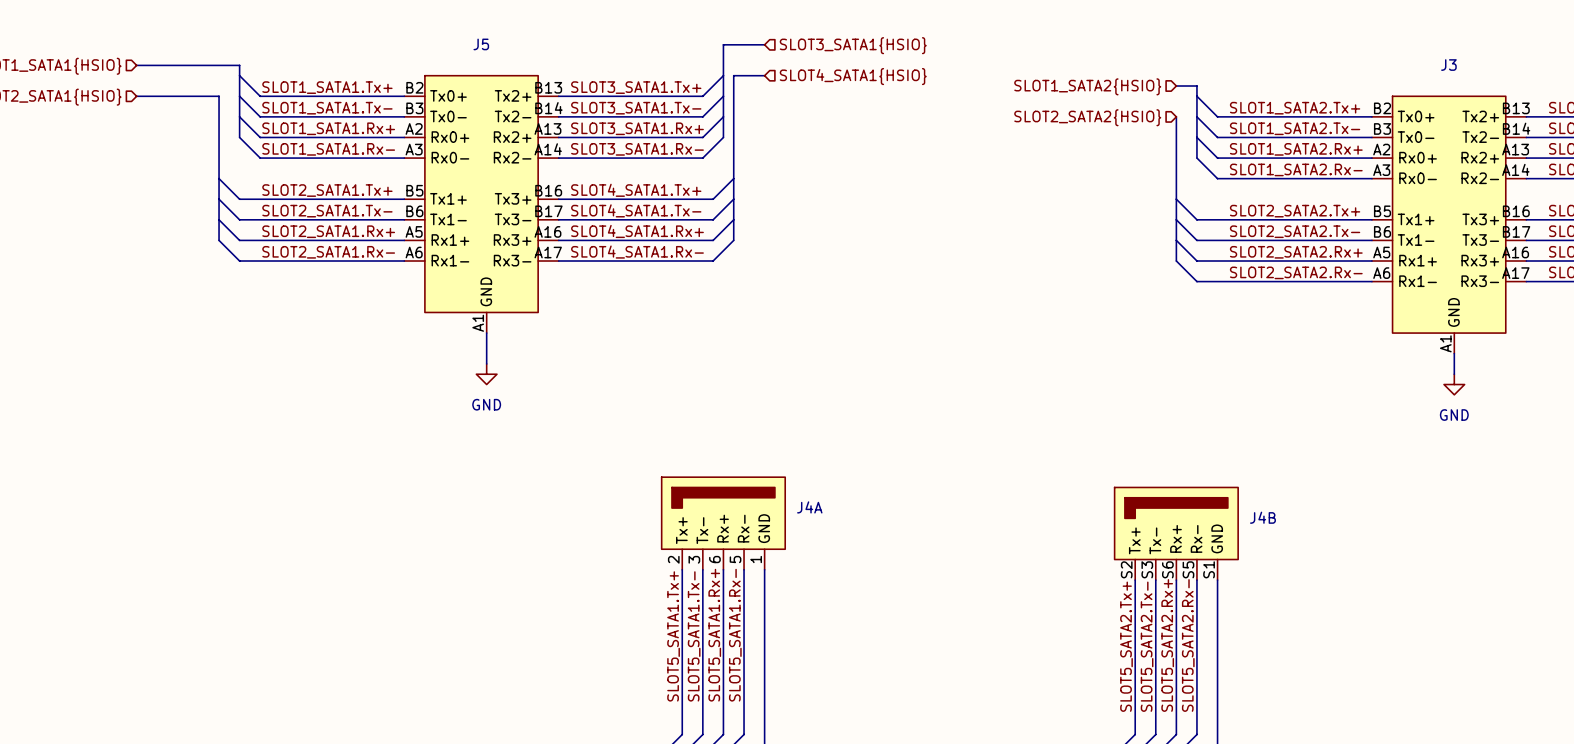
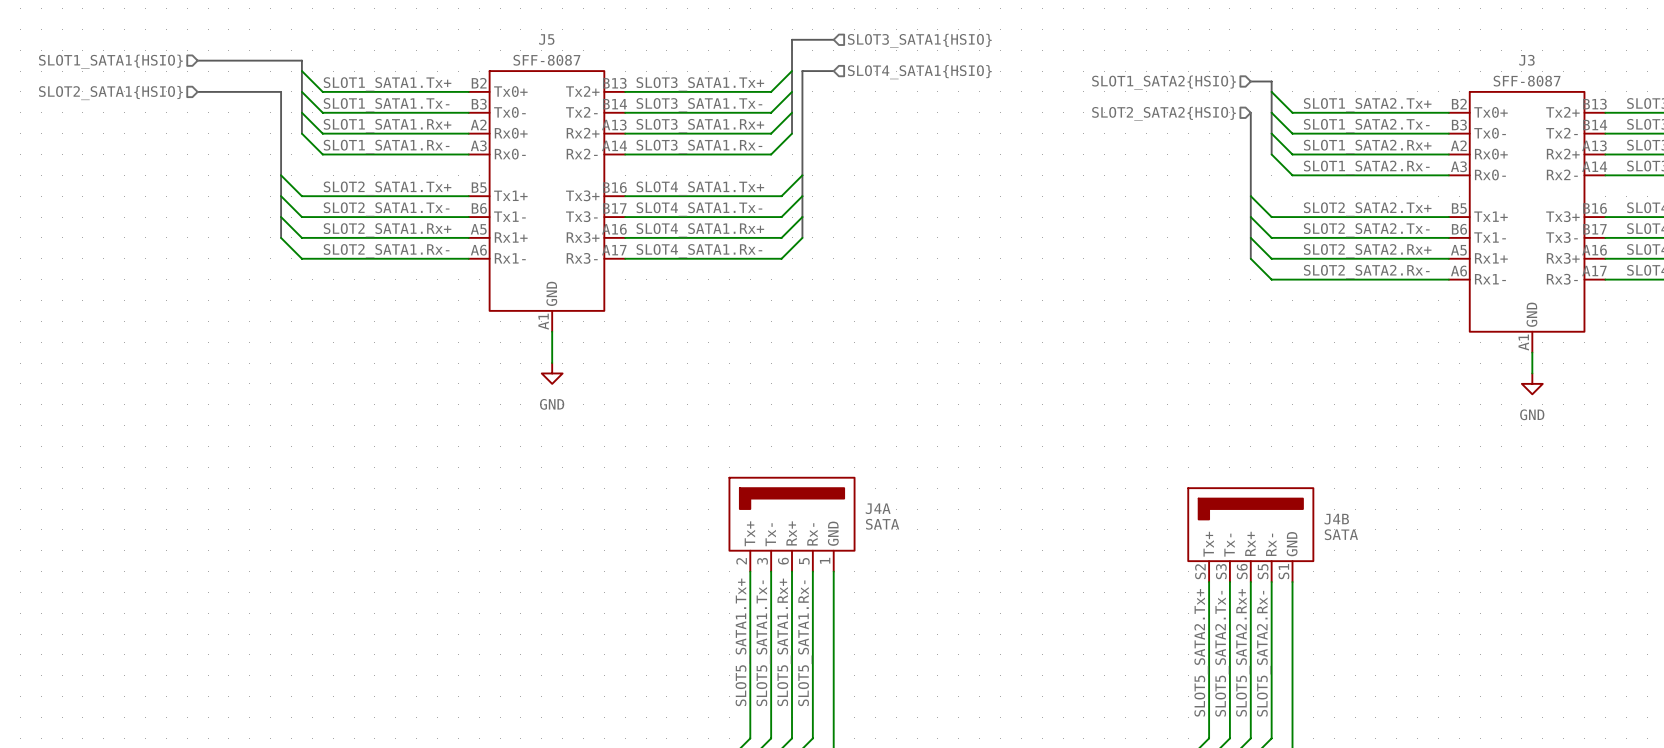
J5 value: none -> SFF-8087 (546, 60)
J3 value: none -> SFF-8087 (1527, 81)
J4A value: none -> SATA (882, 524)
J4B value: none -> SATA (1341, 534)

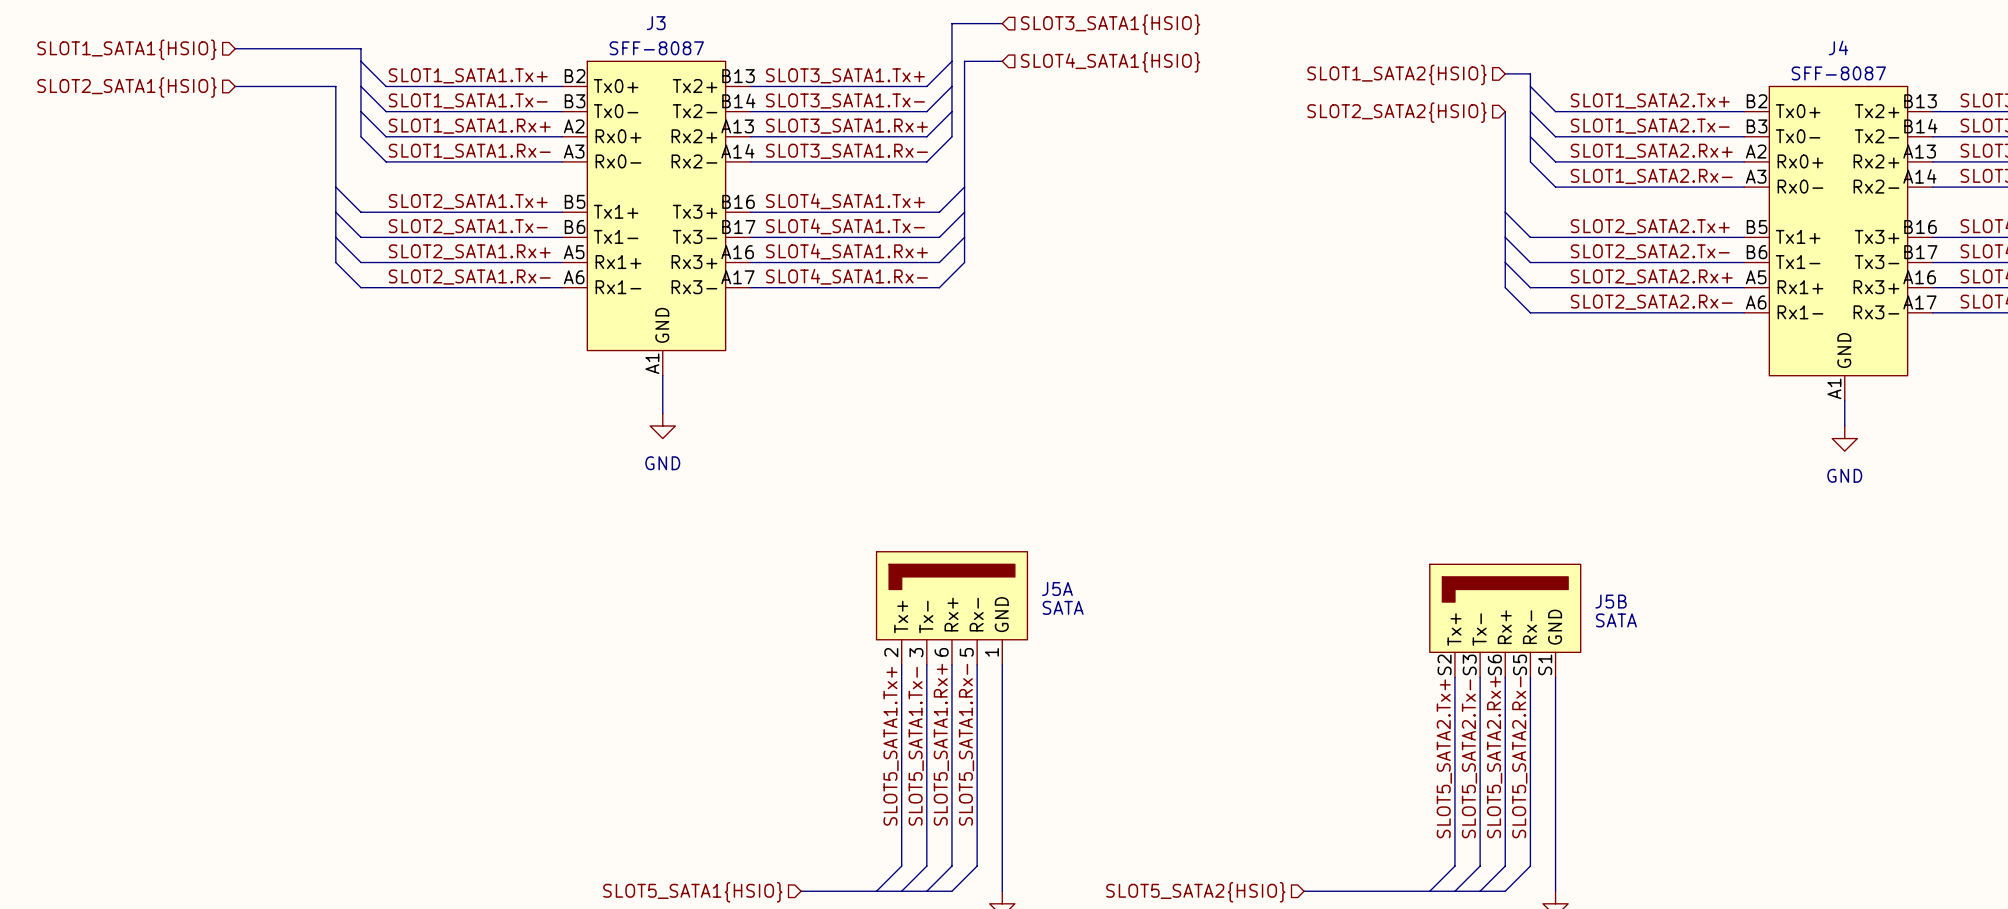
J5 name: J5 (546, 39) -> J3 (656, 23)
J3 name: J3 (1526, 60) -> J4 (1838, 47)
J4A name: J4A (878, 508) -> J5A (1057, 588)
J4B name: J4B (1336, 519) -> J5B (1611, 601)

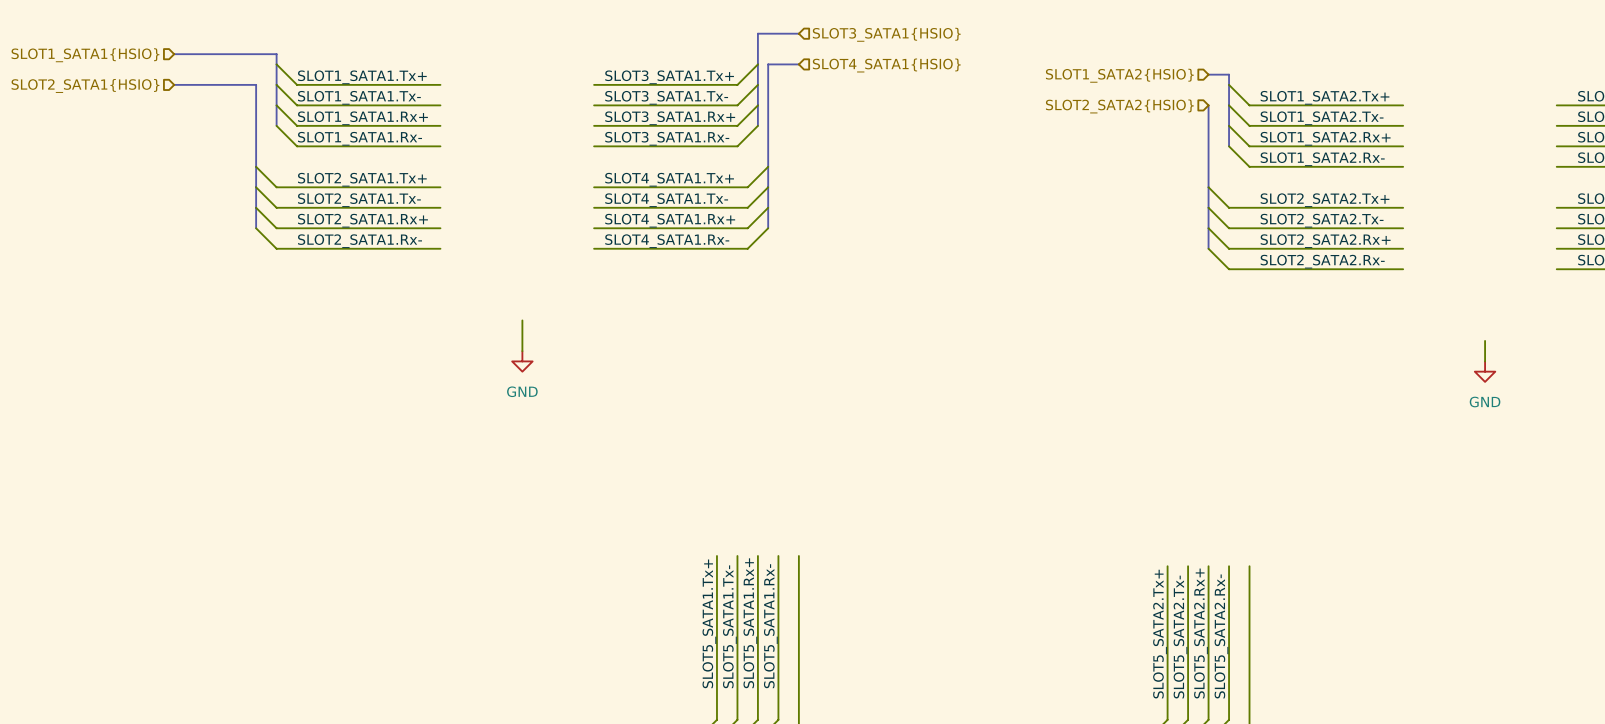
J3: SFF-8087 (656, 218) -> none
J4: SFF-8087 (1838, 243) -> none
J5A: SATA (951, 608) -> none
J5B: SATA (1505, 620) -> none

